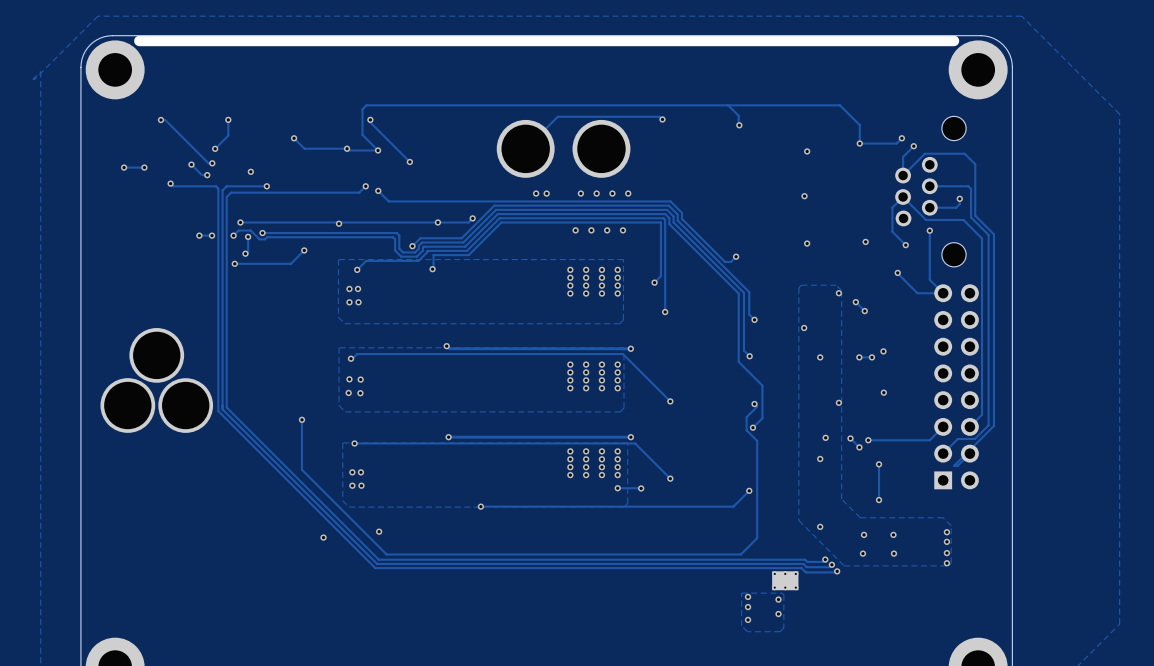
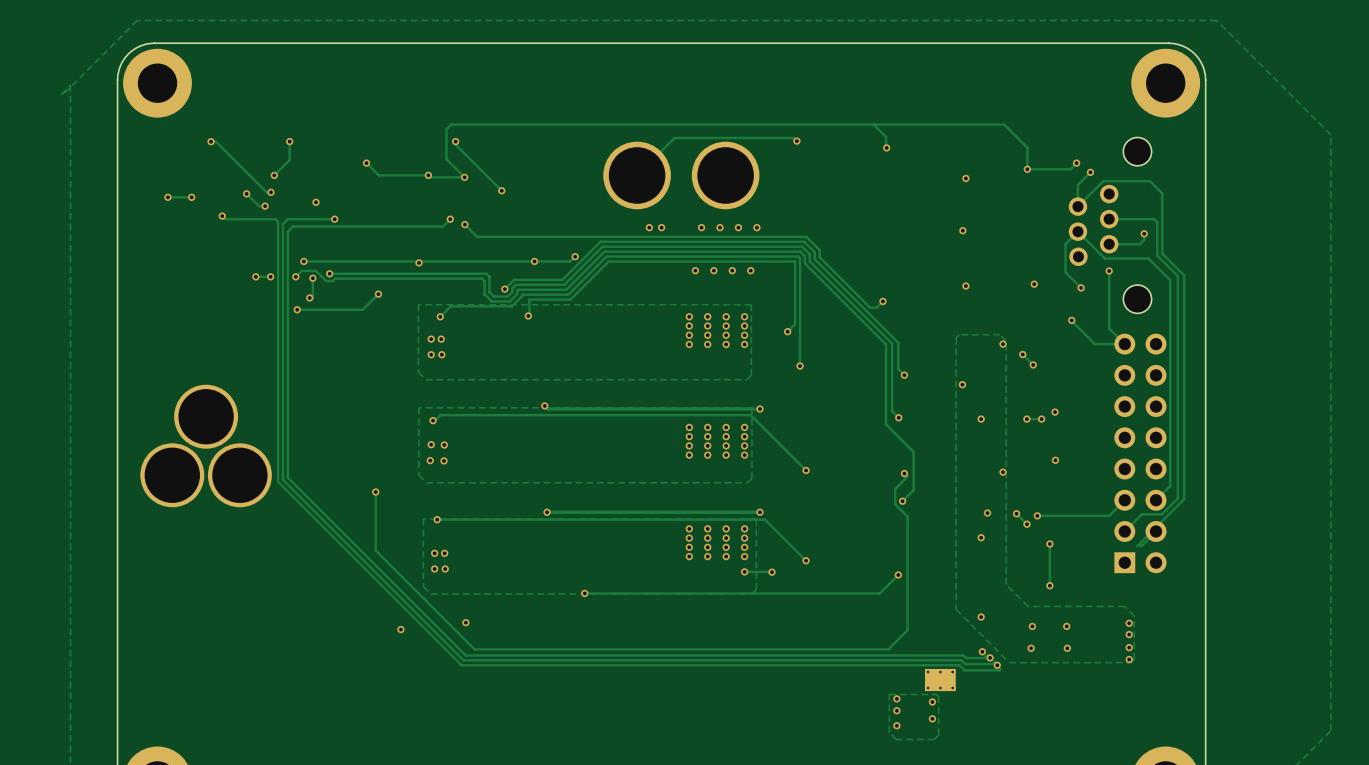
line: (953, 40) (139, 40) -> none
via: none -> (982, 651)
via: (825, 559) -> none
via: none -> (990, 657)
via: (831, 564) -> none
via: none -> (997, 665)
via: (837, 571) -> none

